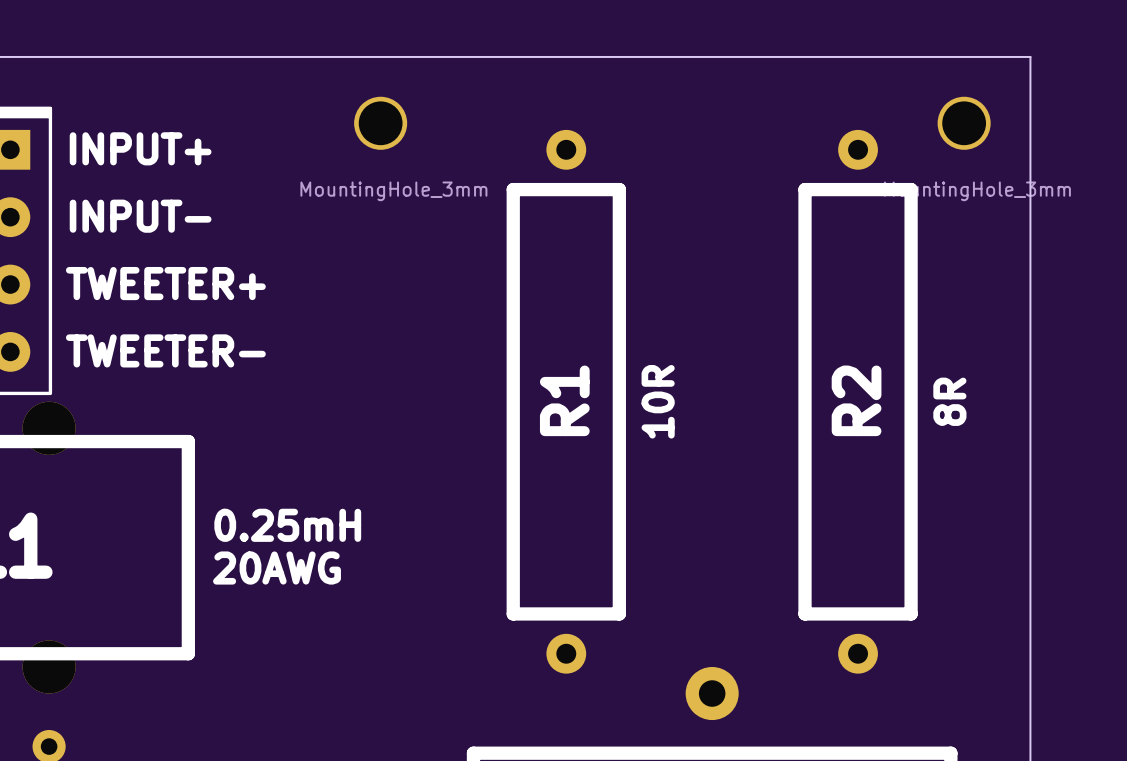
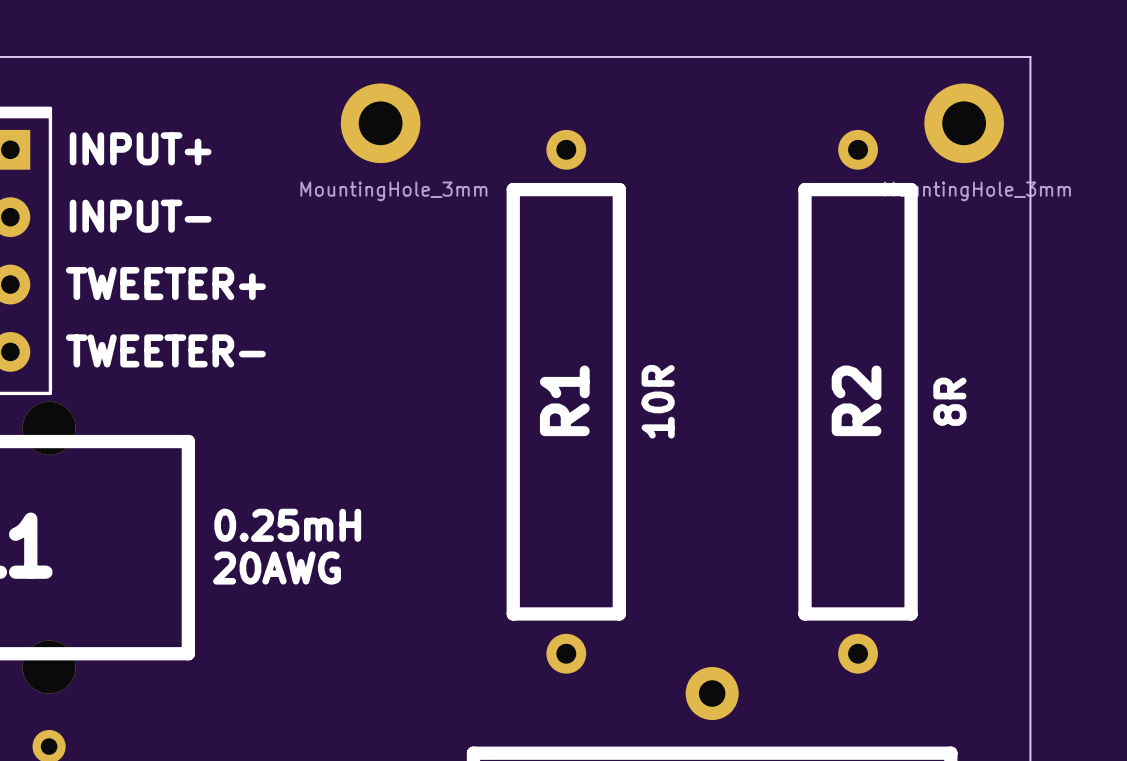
part footprint: [354, 96, 408, 150] -> [340, 83, 421, 164]
part footprint: [937, 96, 991, 150] -> [924, 83, 1004, 164]

